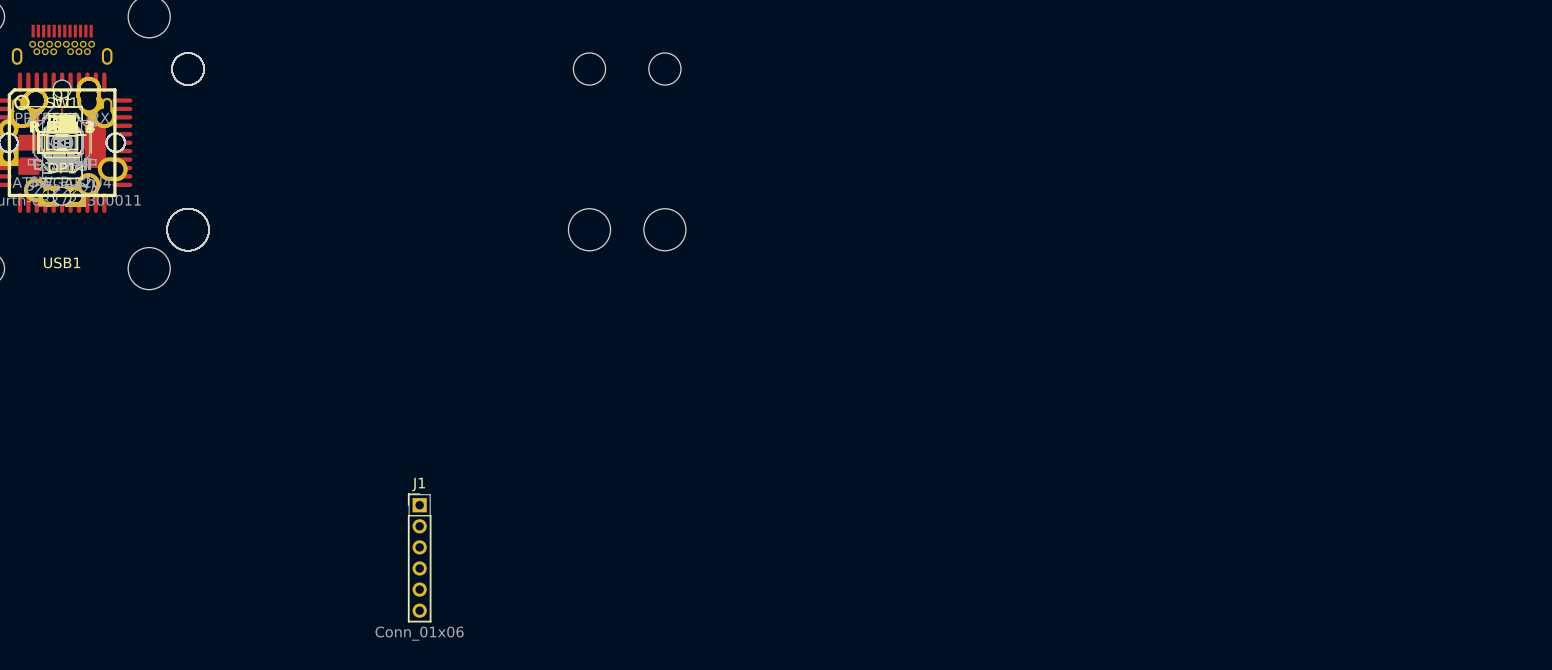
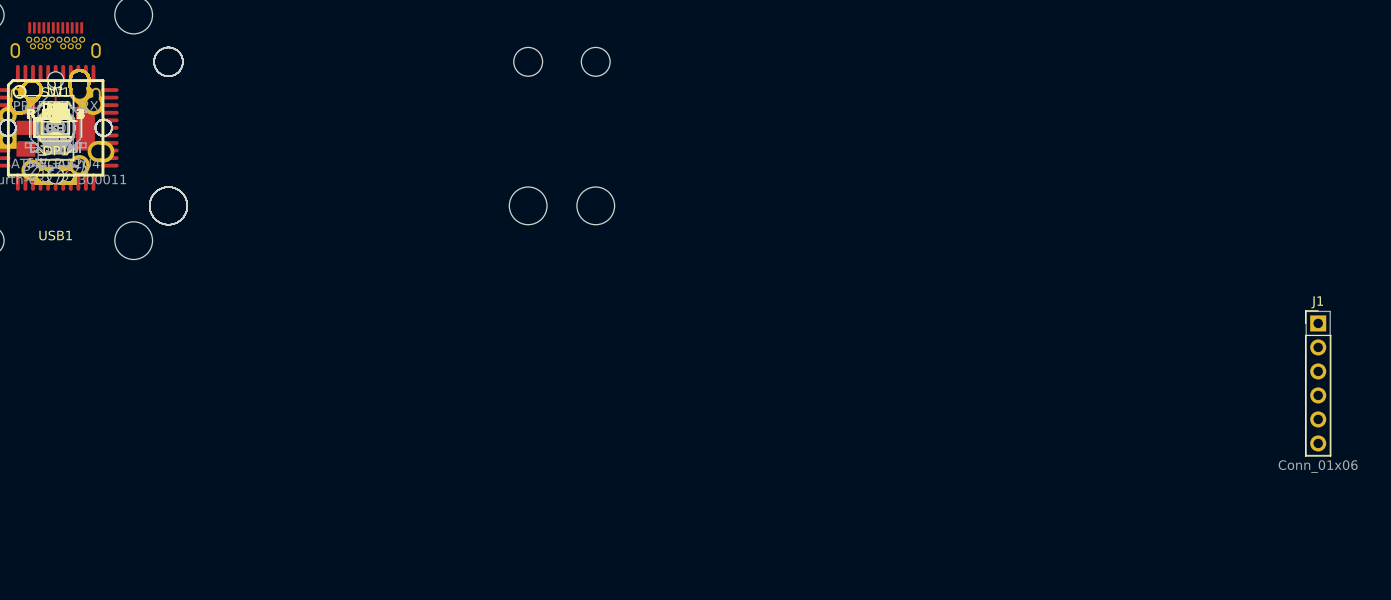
J1 footprint: [407, 493, 432, 623] -> [1305, 310, 1332, 457]

